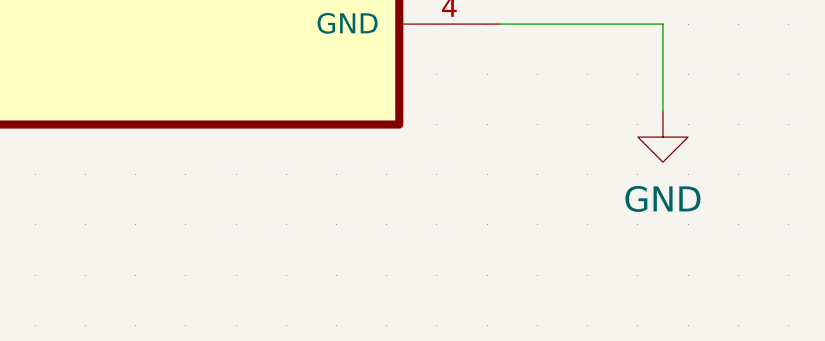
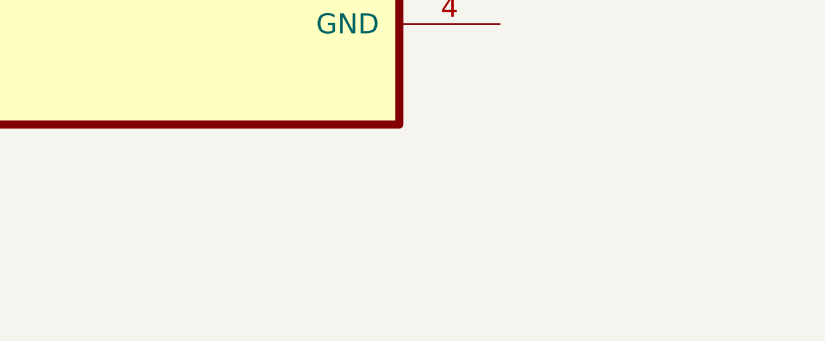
wire: (499, 24) (662, 24) (662, 111) -> none
power symbol: GND (662, 137) -> none

